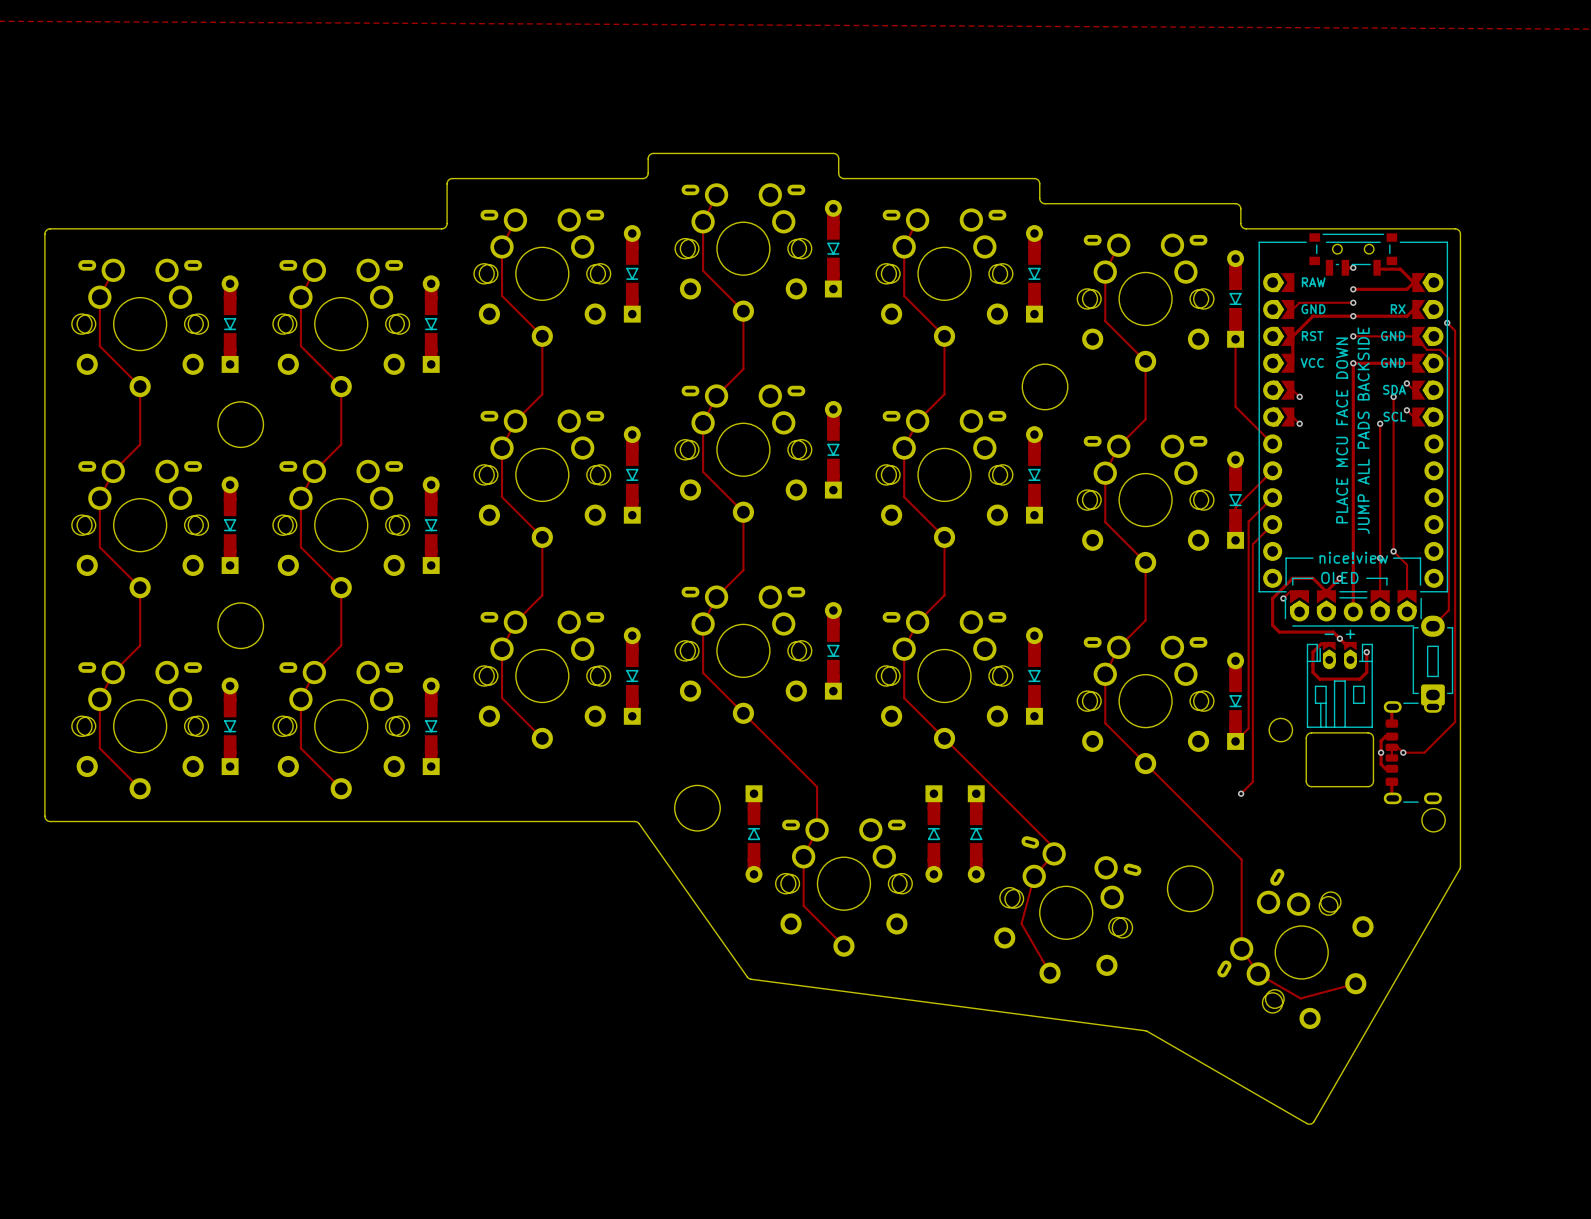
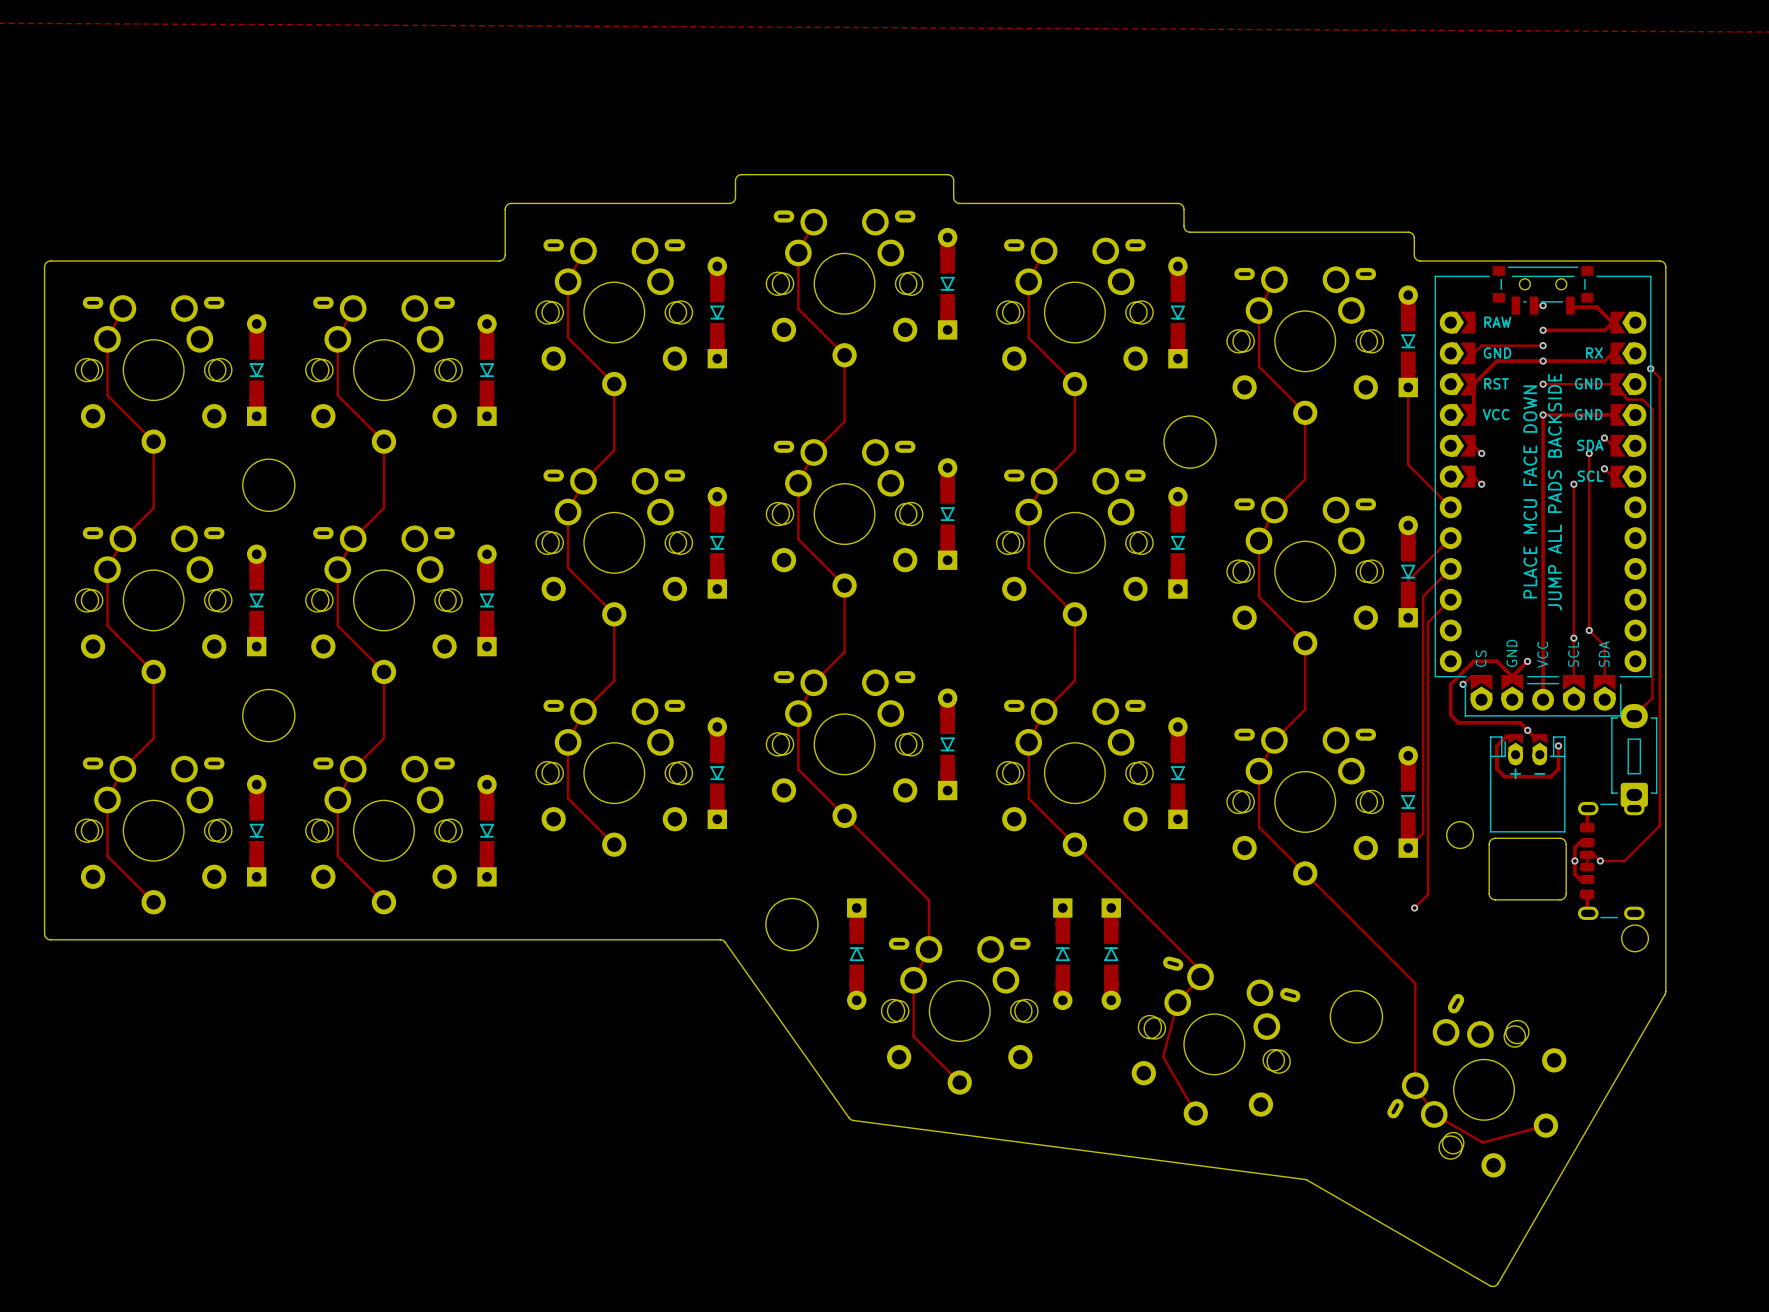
part: (1353, 592) -> none
part: none -> (1543, 695)
part footprint: [1306, 641, 1373, 728] -> [1489, 734, 1566, 833]

